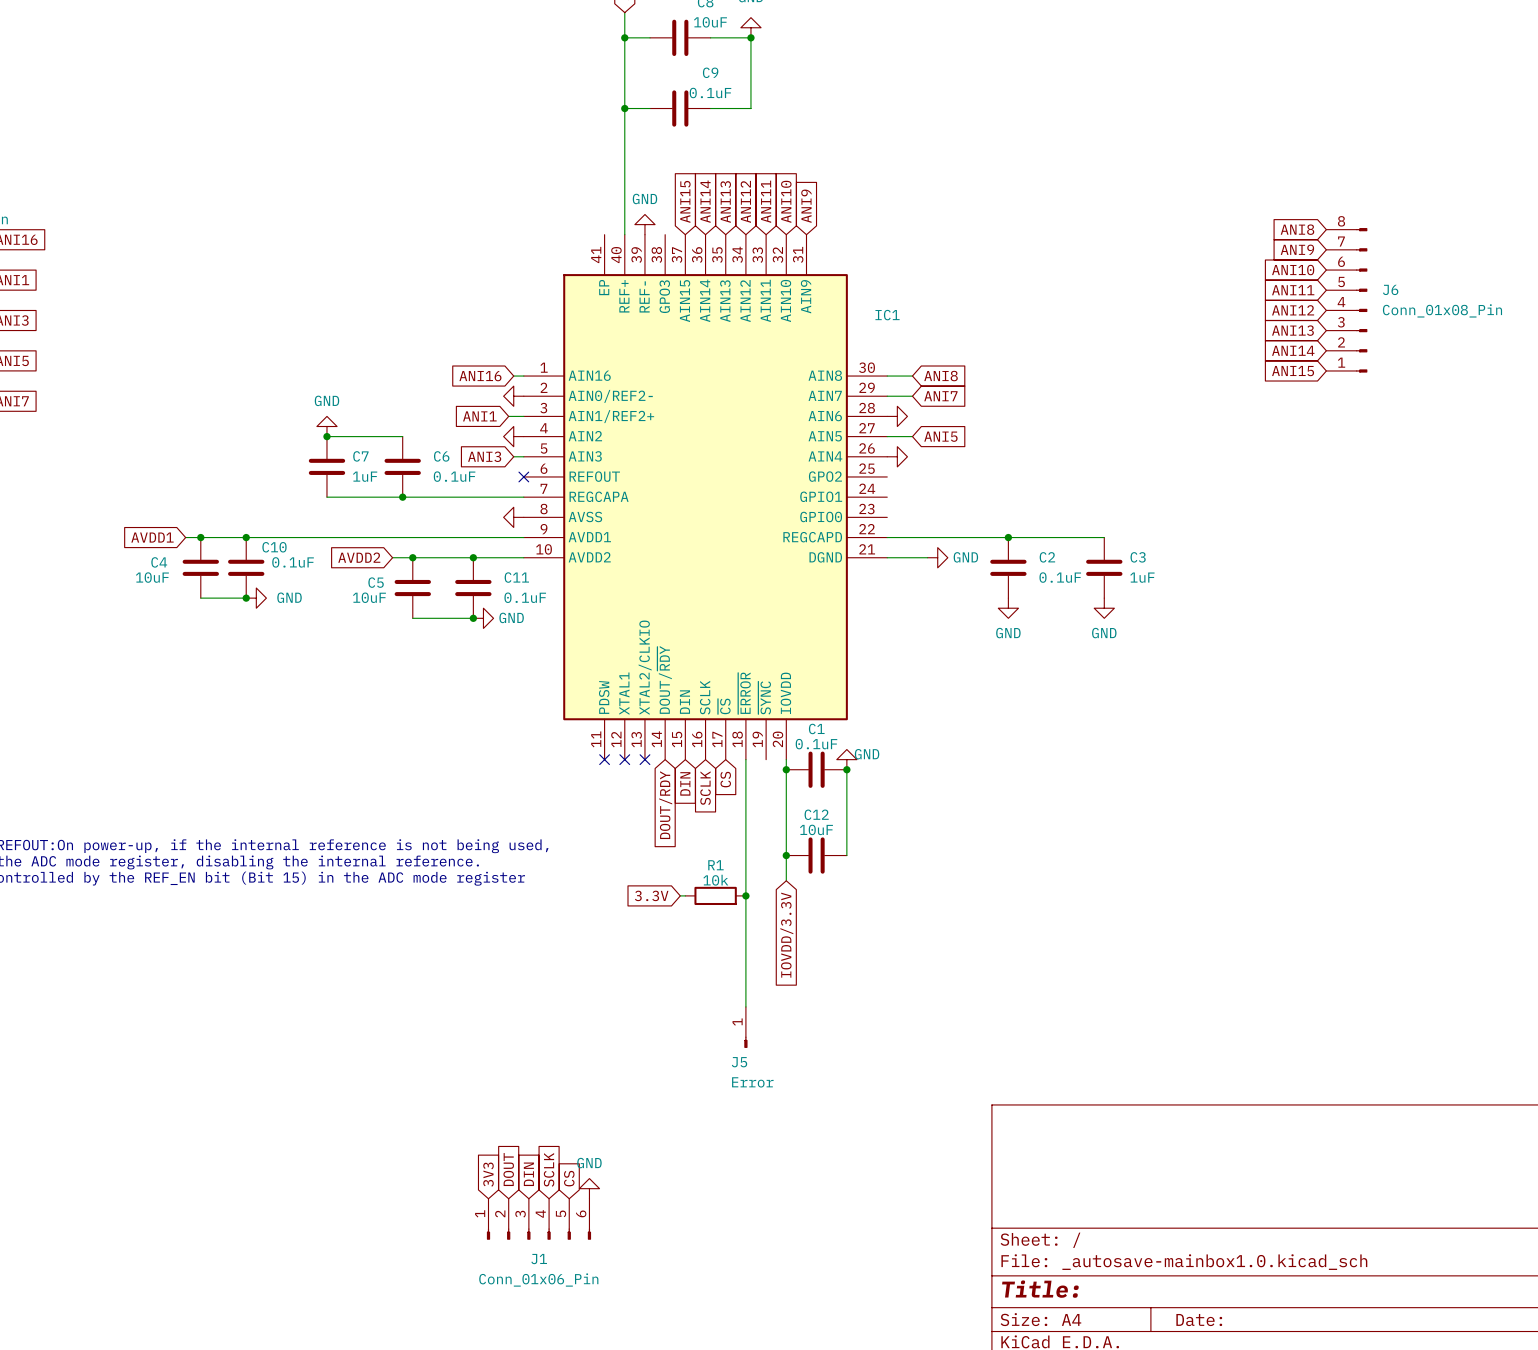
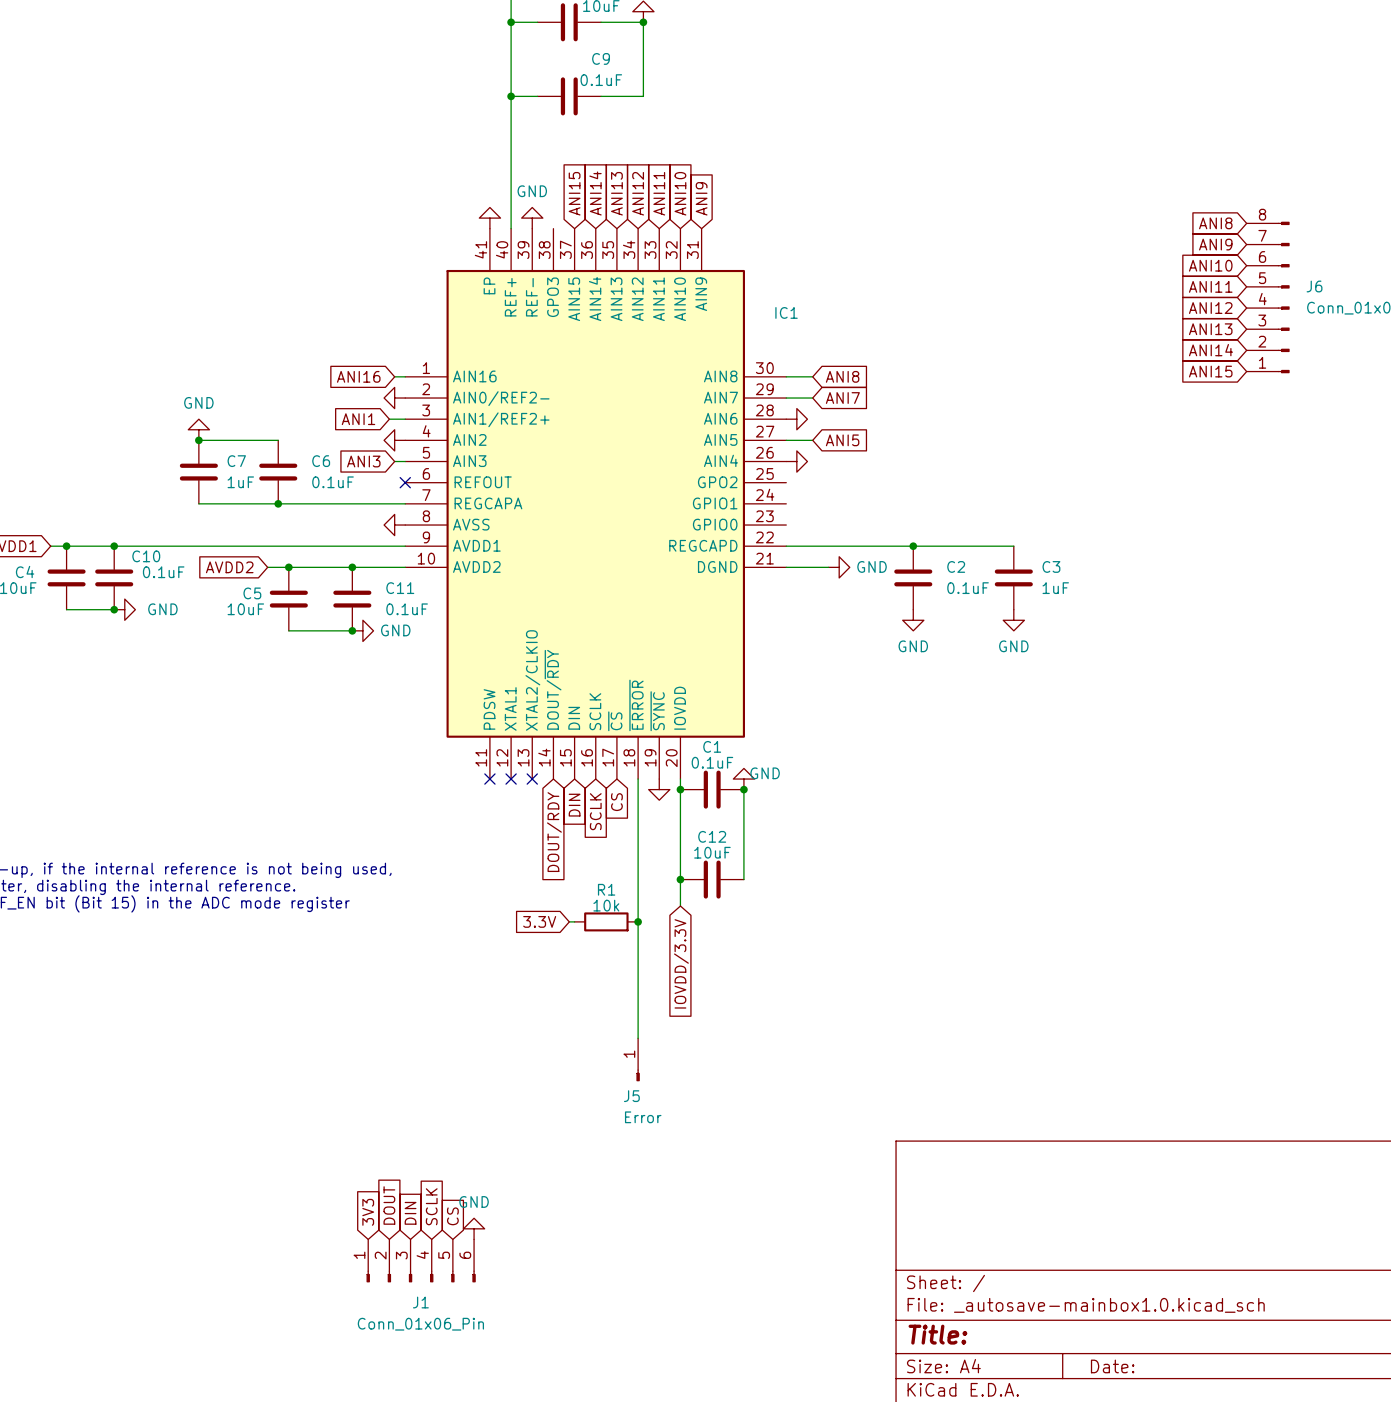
power symbol: none -> (489, 218)
power symbol: none -> (659, 789)

